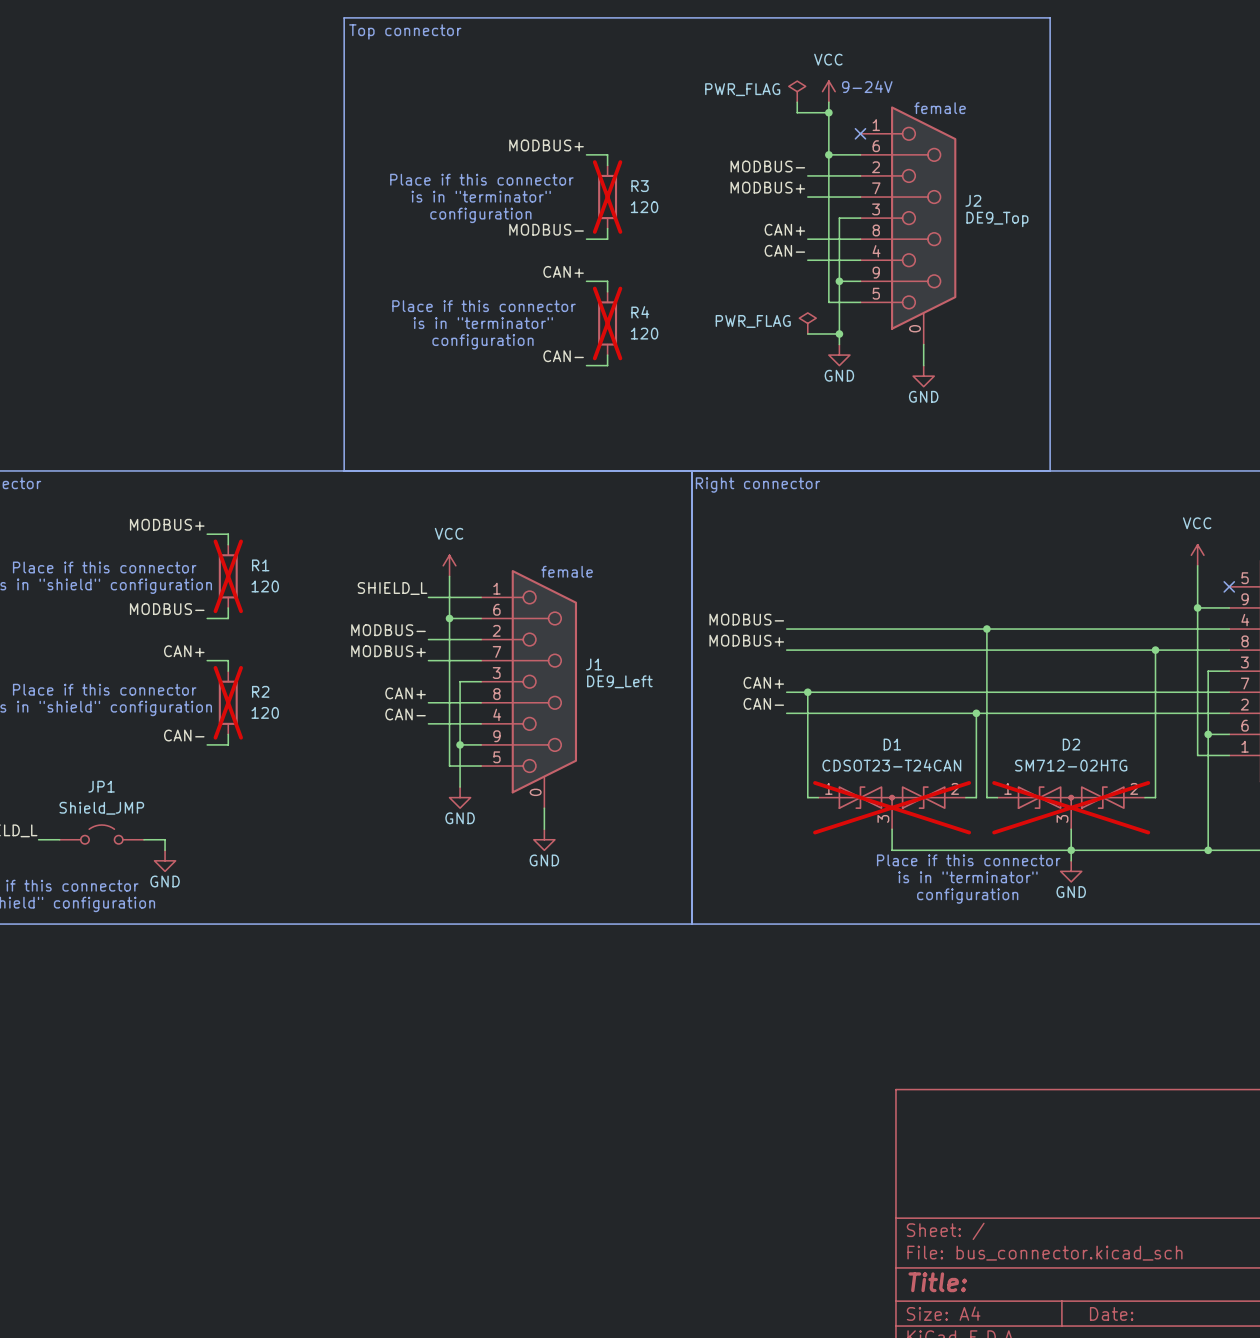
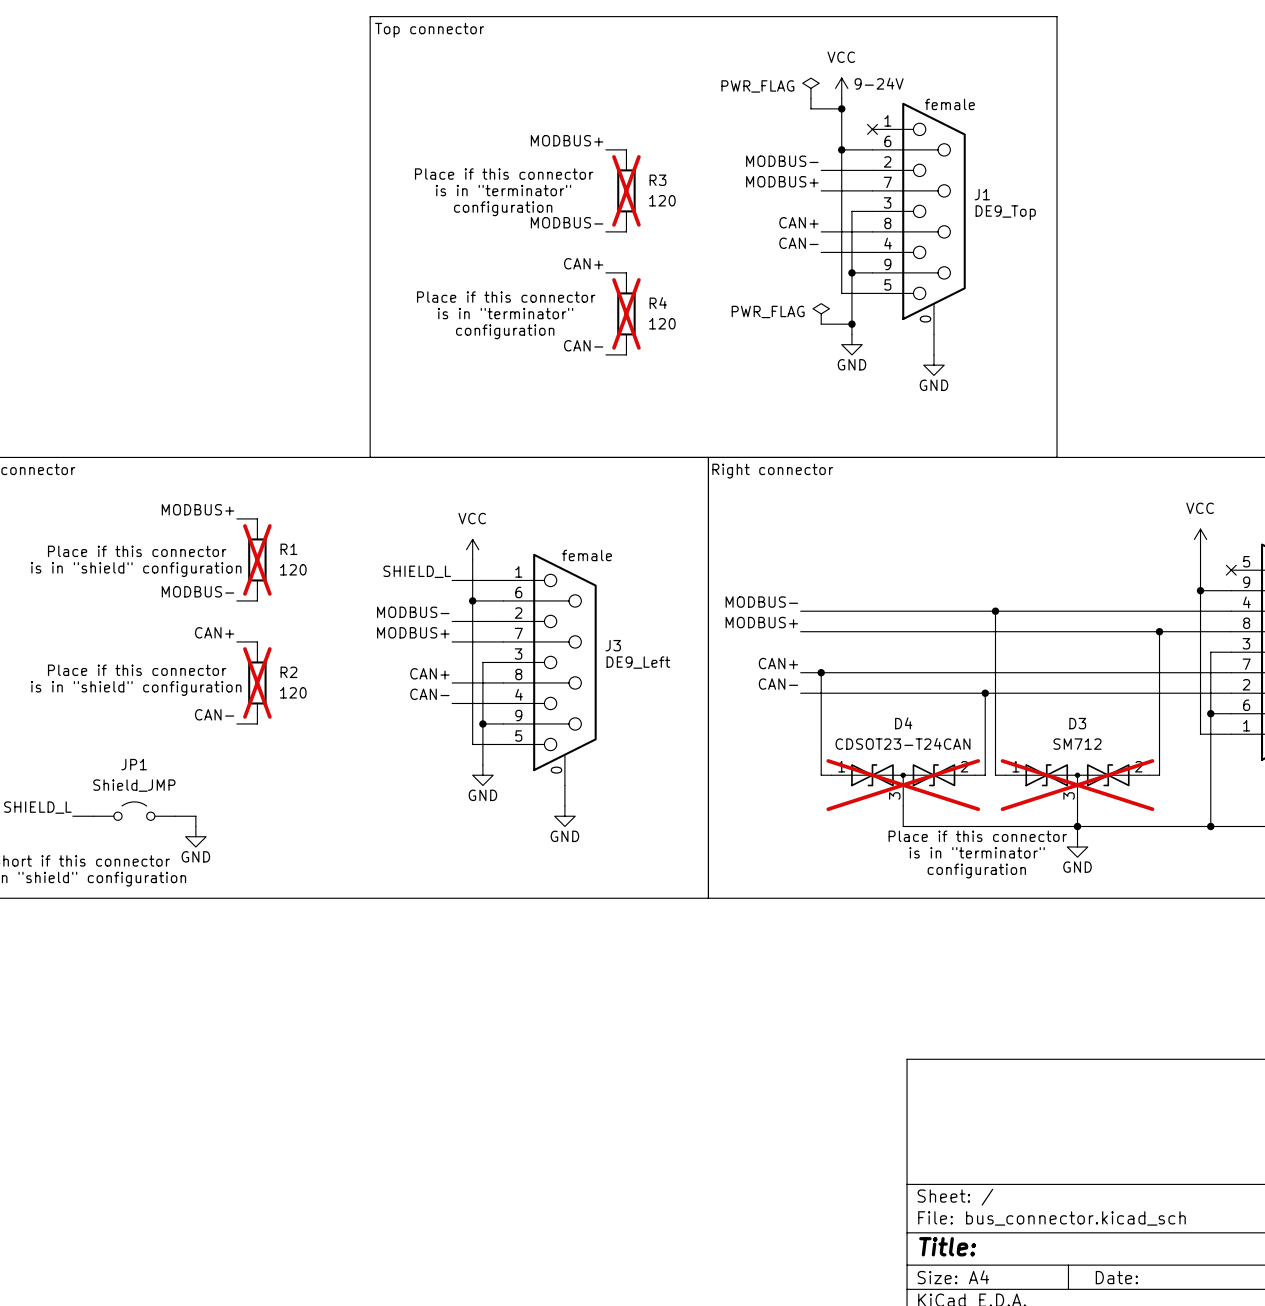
J2 name: J2 (973, 200) -> J1 (982, 194)
J1 name: J1 (594, 664) -> J3 (613, 645)
D1 name: D1 (892, 744) -> D4 (903, 723)
D2 name: D2 (1071, 744) -> D3 (1077, 723)
D2 value: SM712-02HTG (1071, 765) -> SM712 (1077, 744)

